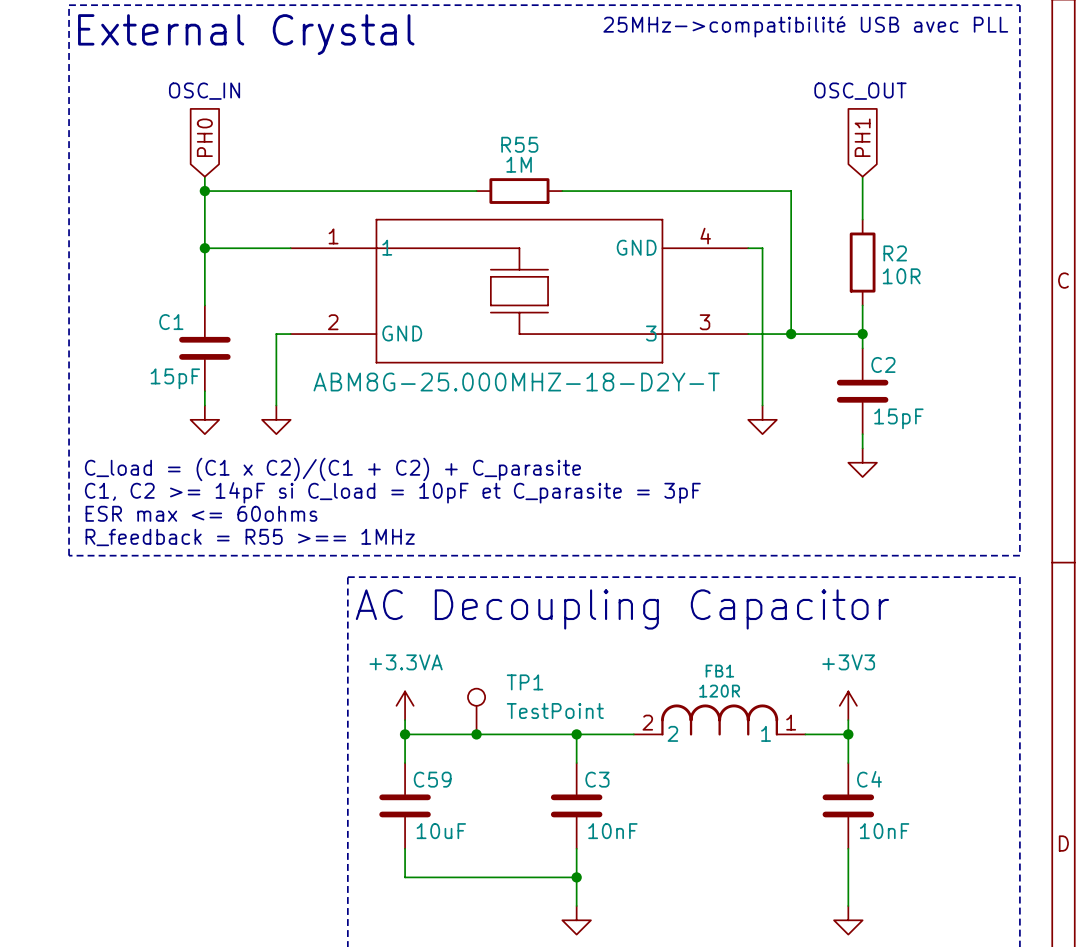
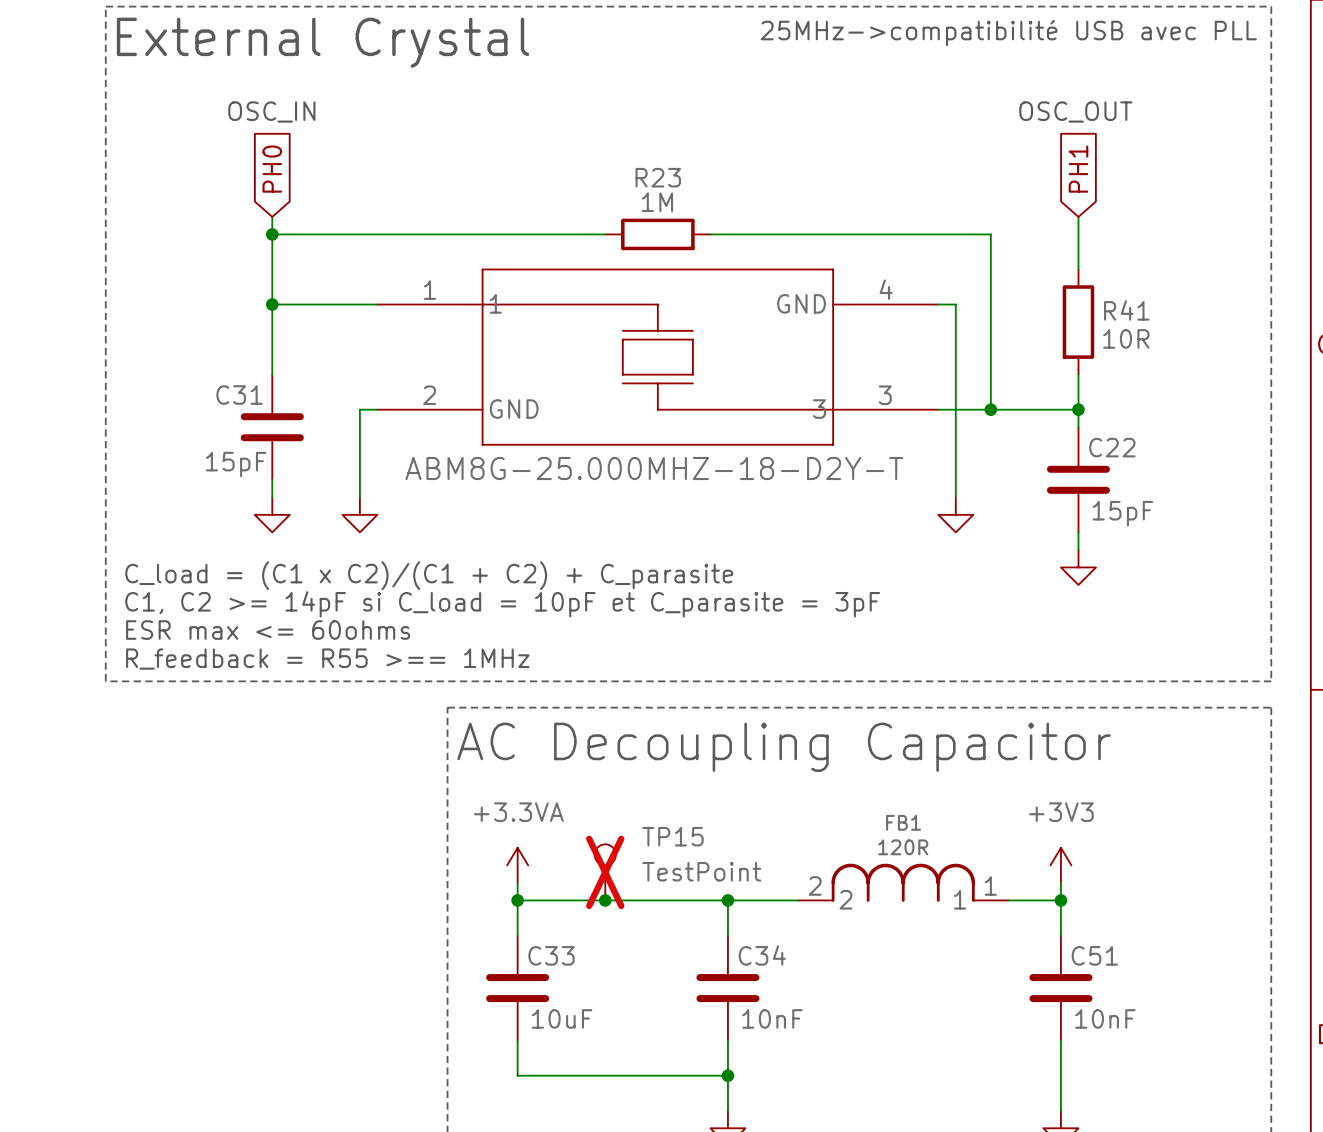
R55 name: R55 (519, 144) -> R23 (658, 177)
R2 name: R2 (895, 253) -> R41 (1126, 310)
C1 name: C1 (171, 322) -> C31 (239, 395)
C2 name: C2 (883, 364) -> C22 (1112, 447)
TP1 name: TP1 (525, 682) -> TP15 (673, 836)
TP1 do-not-place cross: none -> (605, 872)
C59 name: C59 (432, 779) -> C33 (551, 955)
C3 name: C3 (597, 779) -> C34 (762, 955)
C4 name: C4 (869, 779) -> C51 (1094, 955)

